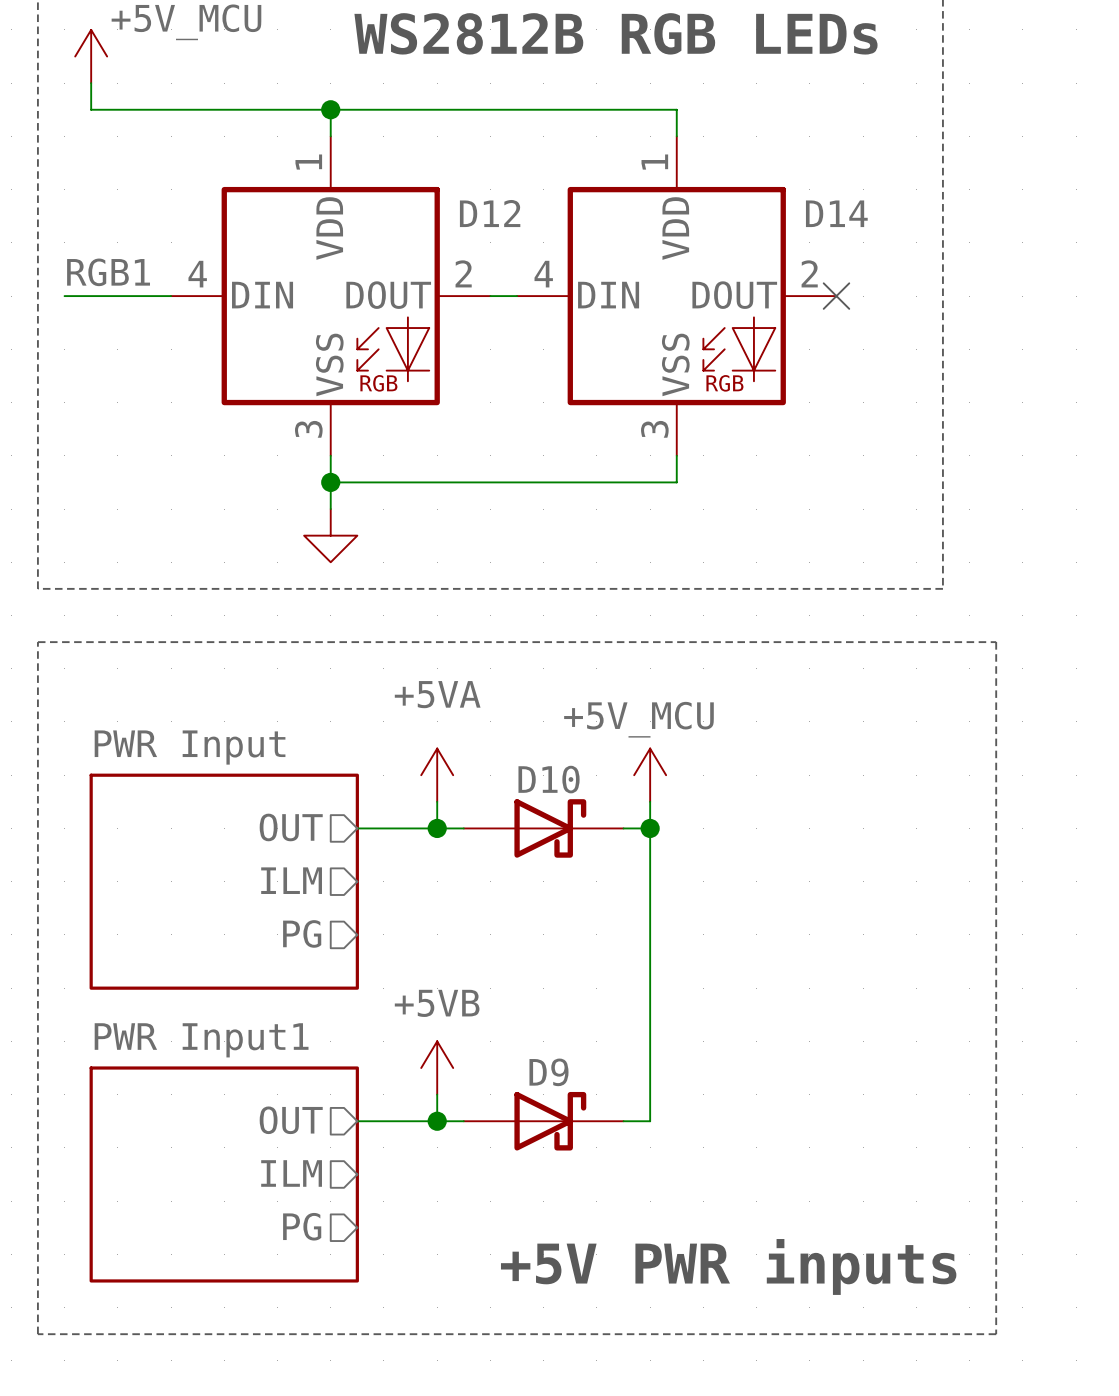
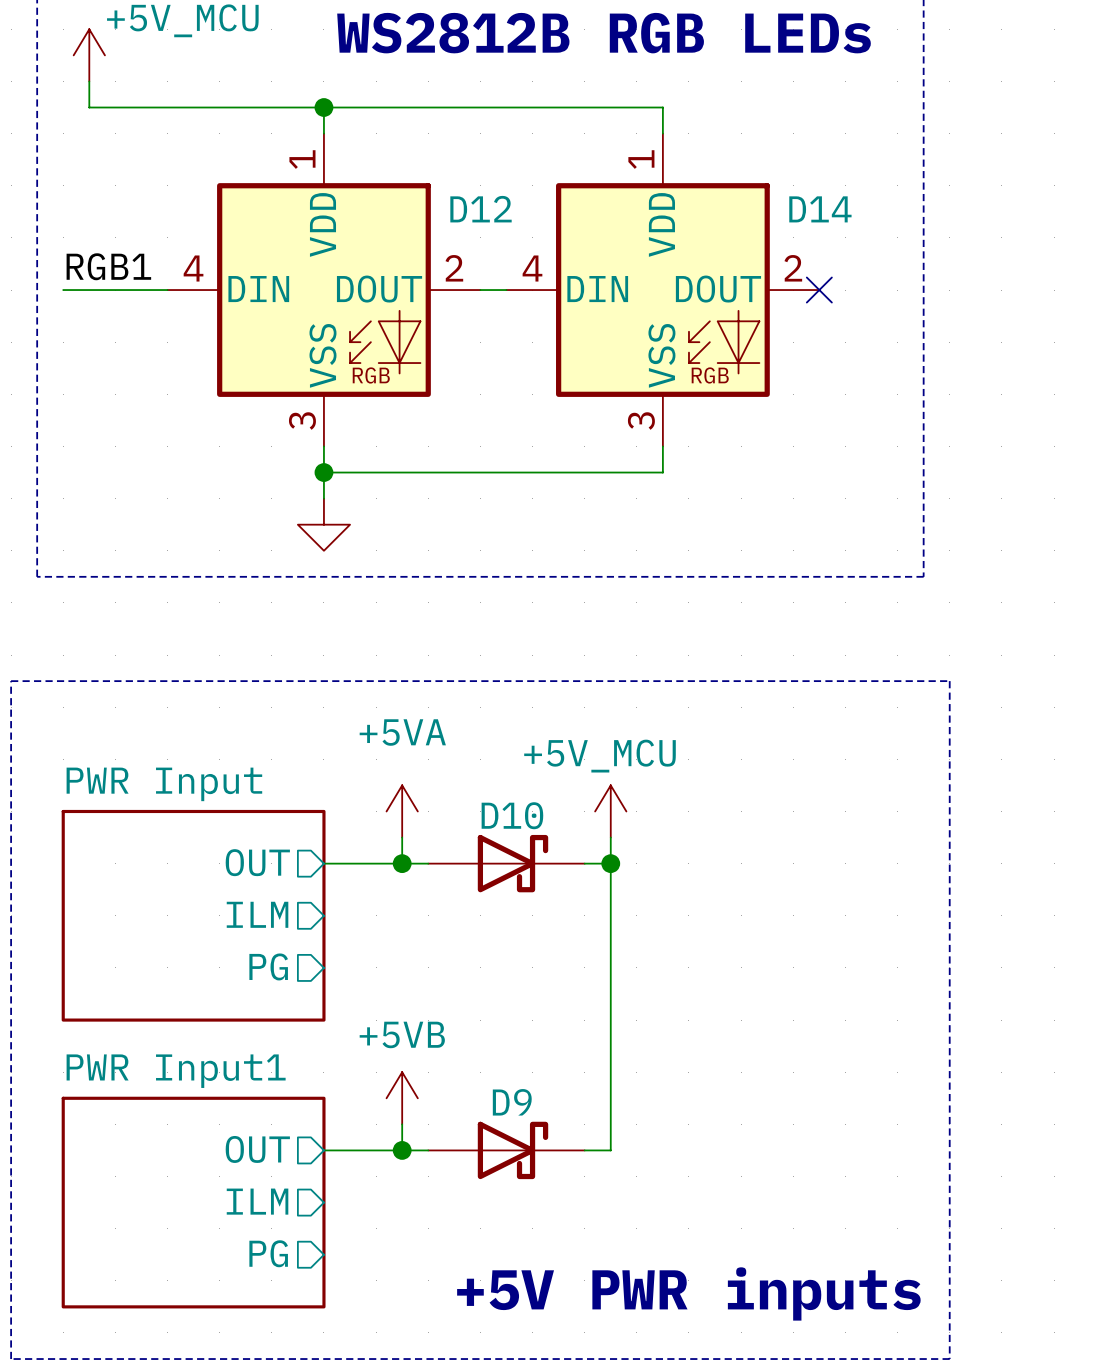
line: (37, 642) (996, 642) (996, 1334) (37, 1334) (37, 642) -> (11, 681) (949, 681) (949, 1359) (11, 1359) (11, 681)
power symbol position: +5VA (437, 775) -> +5VA (402, 811)
power symbol position: +5V_MCU (650, 775) -> +5V_MCU (610, 811)
wire: (437, 801) (437, 828) -> (402, 837) (402, 863)
wire: (650, 801) (650, 1121) (623, 1121) -> (610, 837) (610, 1150) (584, 1150)
sheet pin position: OUT (291, 827) -> OUT (257, 862)
wire: (357, 828) (463, 828) -> (323, 863) (428, 863)
junction position: (437, 828) -> (402, 863)
D10 position: (543, 828) -> (506, 863)
wire: (623, 828) (650, 828) -> (584, 863) (610, 863)
junction position: (650, 828) -> (610, 863)
sheet pin position: ILM (291, 880) -> ILM (257, 914)
sheet PWR Input position: (224, 881) -> (193, 915)
sheet pin position: PG (302, 933) -> PG (268, 966)
power symbol position: +5VB (437, 1068) -> +5VB (402, 1098)
wire: (437, 1094) (437, 1121) -> (402, 1124) (402, 1150)
sheet pin position: OUT (291, 1120) -> OUT (257, 1149)
wire: (357, 1121) (463, 1121) -> (323, 1150) (428, 1150)
junction position: (437, 1121) -> (402, 1150)
D9 position: (543, 1121) -> (506, 1150)
sheet pin position: ILM (291, 1173) -> ILM (257, 1201)
sheet PWR Input1 position: (224, 1174) -> (193, 1202)
sheet pin position: PG (302, 1226) -> PG (268, 1253)
text position: +5V PWR inputs (728, 1266) -> +5V PWR inputs (688, 1293)

